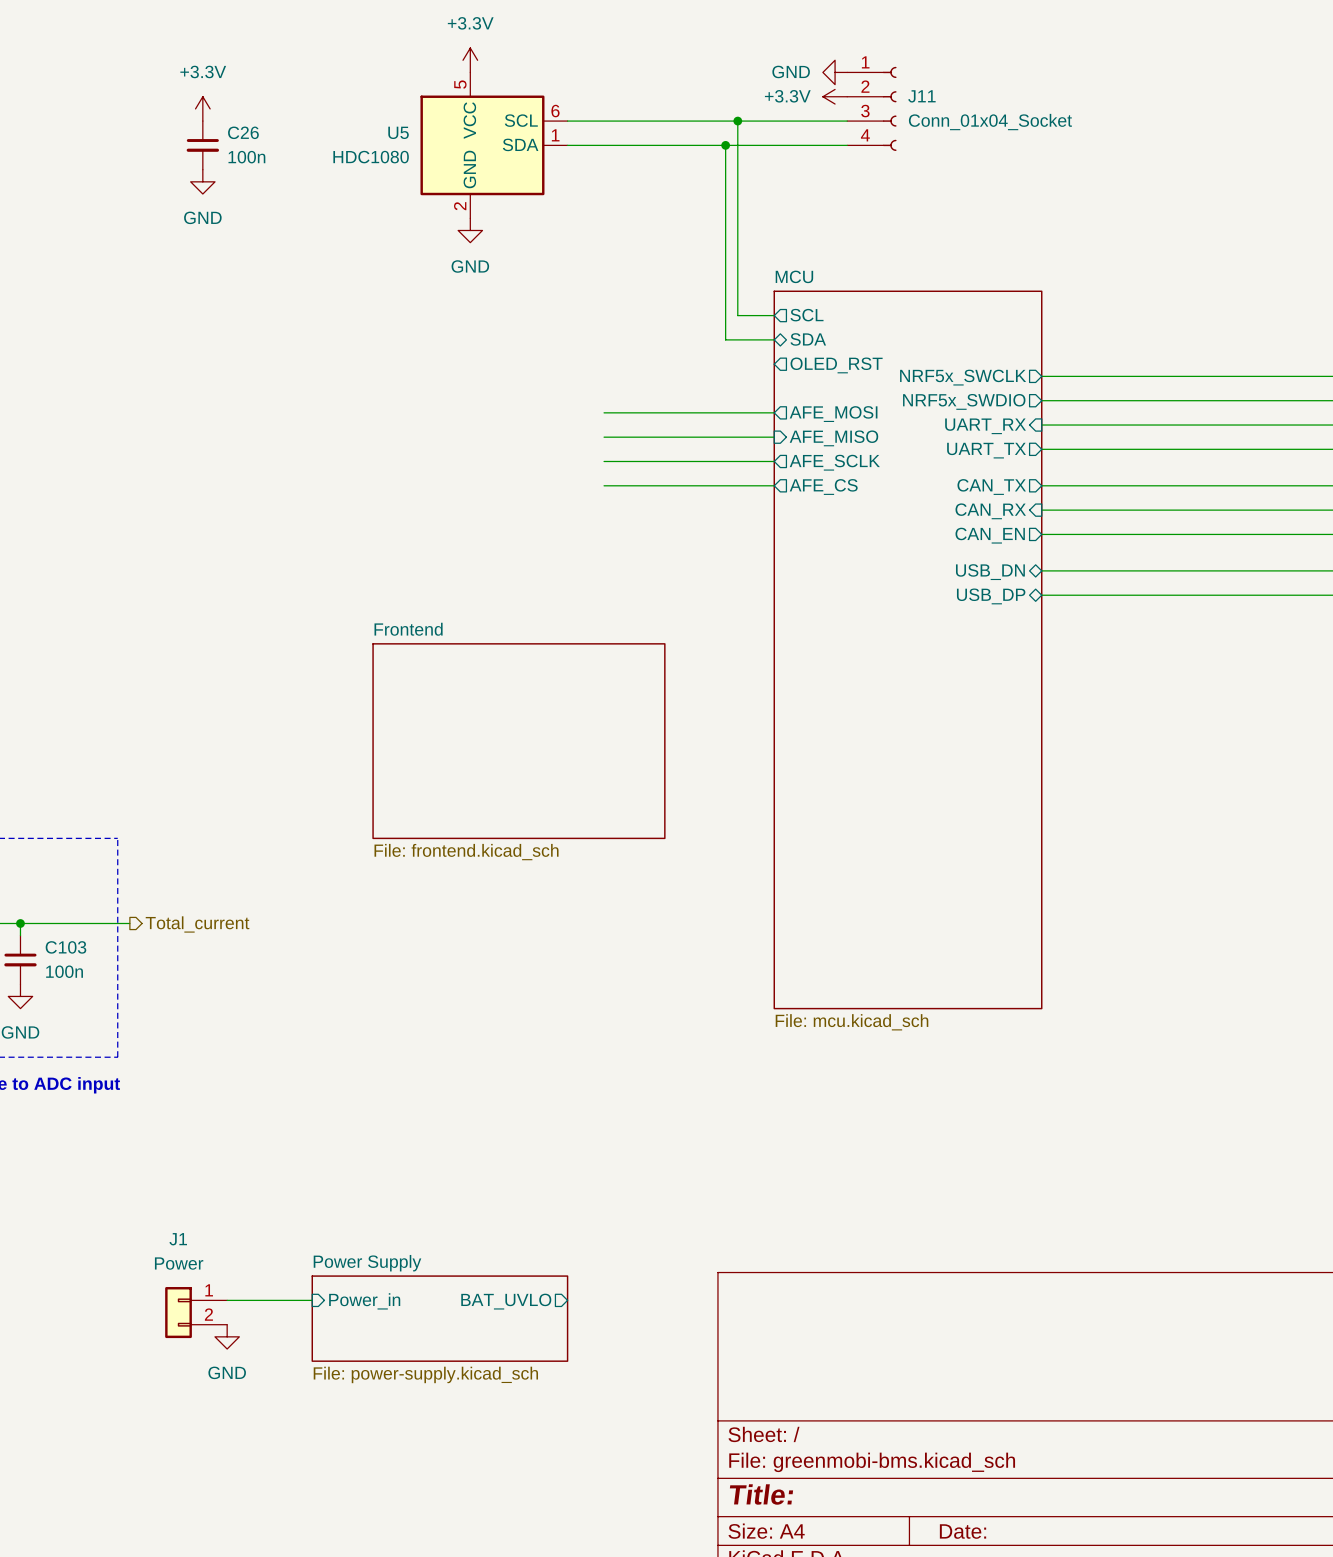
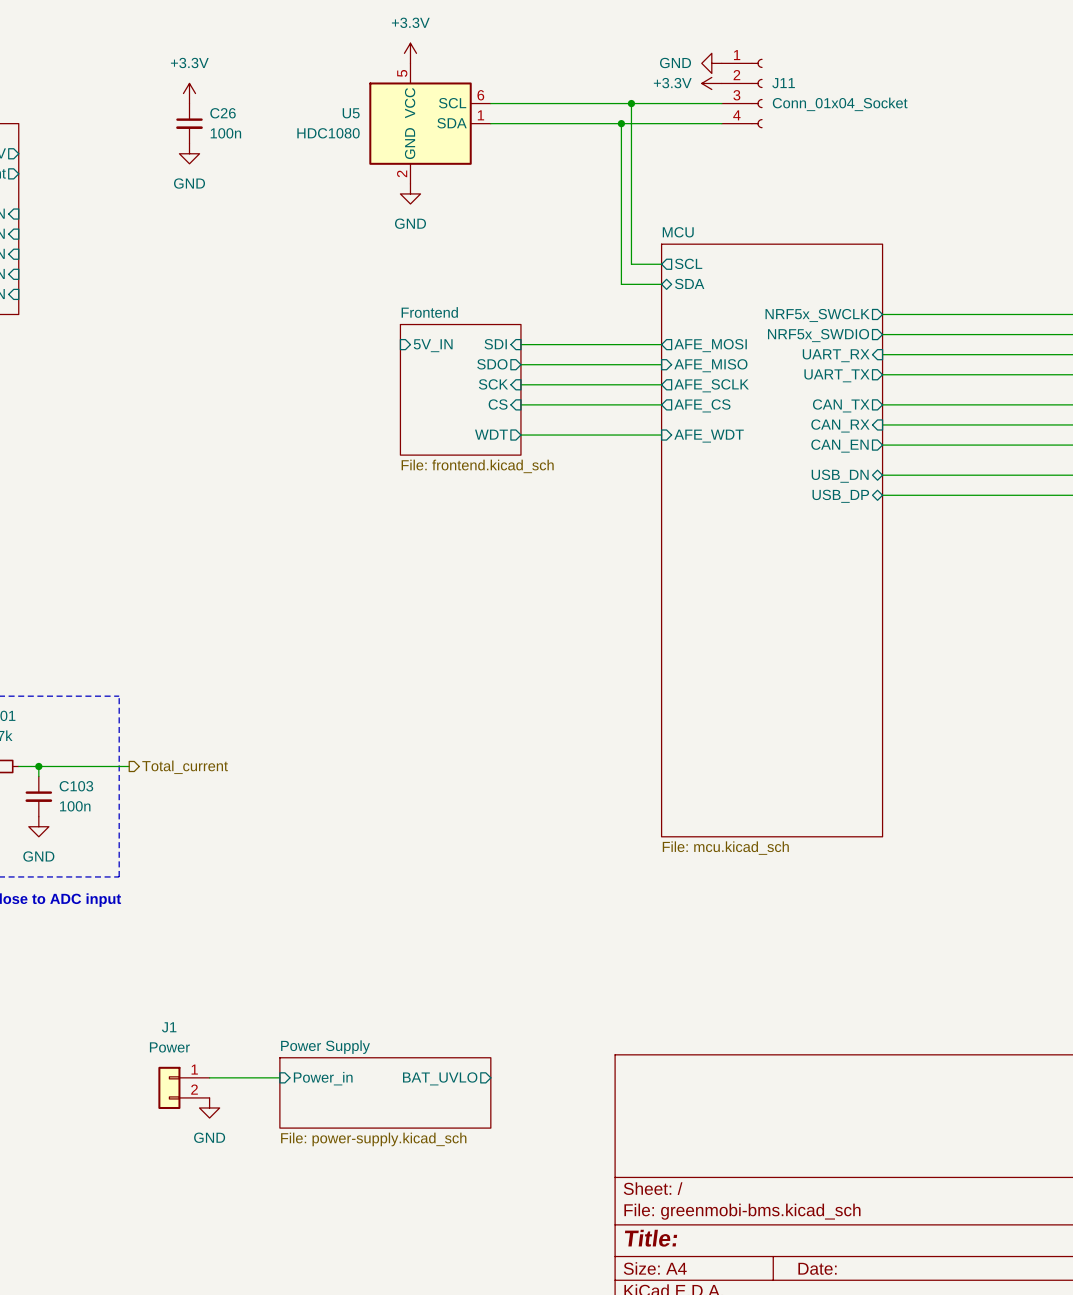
sheet pin: OLED_RST (836, 365) -> none
sheet pin: none -> SDI (495, 344)
sheet pin: none -> 5V_IN (433, 345)
sheet pin: none -> SDO (492, 364)
sheet pin: none -> SCK (493, 384)
sheet Frontend: none -> File: frontend.kicad_sch (460, 389)
sheet pin: none -> CS (498, 404)
sheet pin: none -> WDT (491, 434)
wire: none -> (520, 435) (661, 435)
sheet pin: none -> AFE_WDT (709, 436)
sheet Frontend: File: frontend.kicad_sch (518, 741) -> none

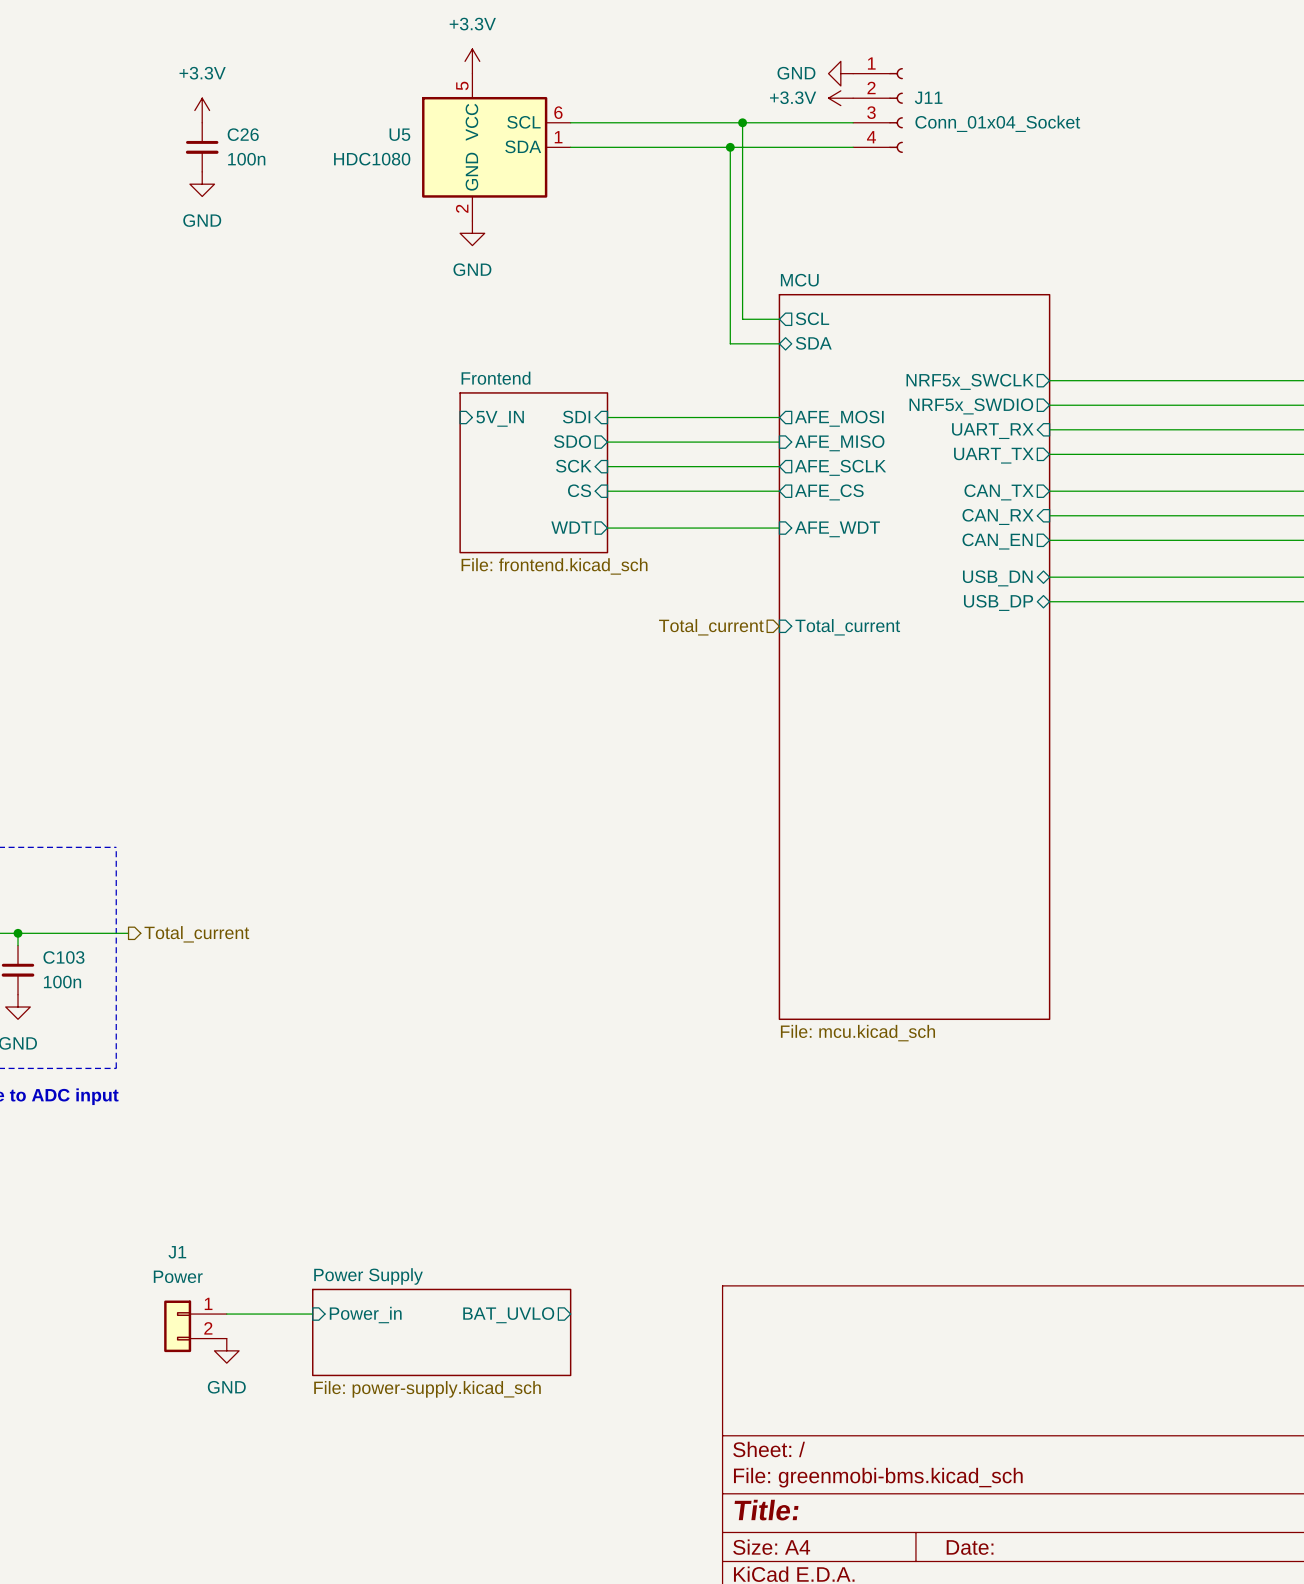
hierarchical label: none -> Total_current (711, 627)
sheet pin: none -> Total_current (847, 627)

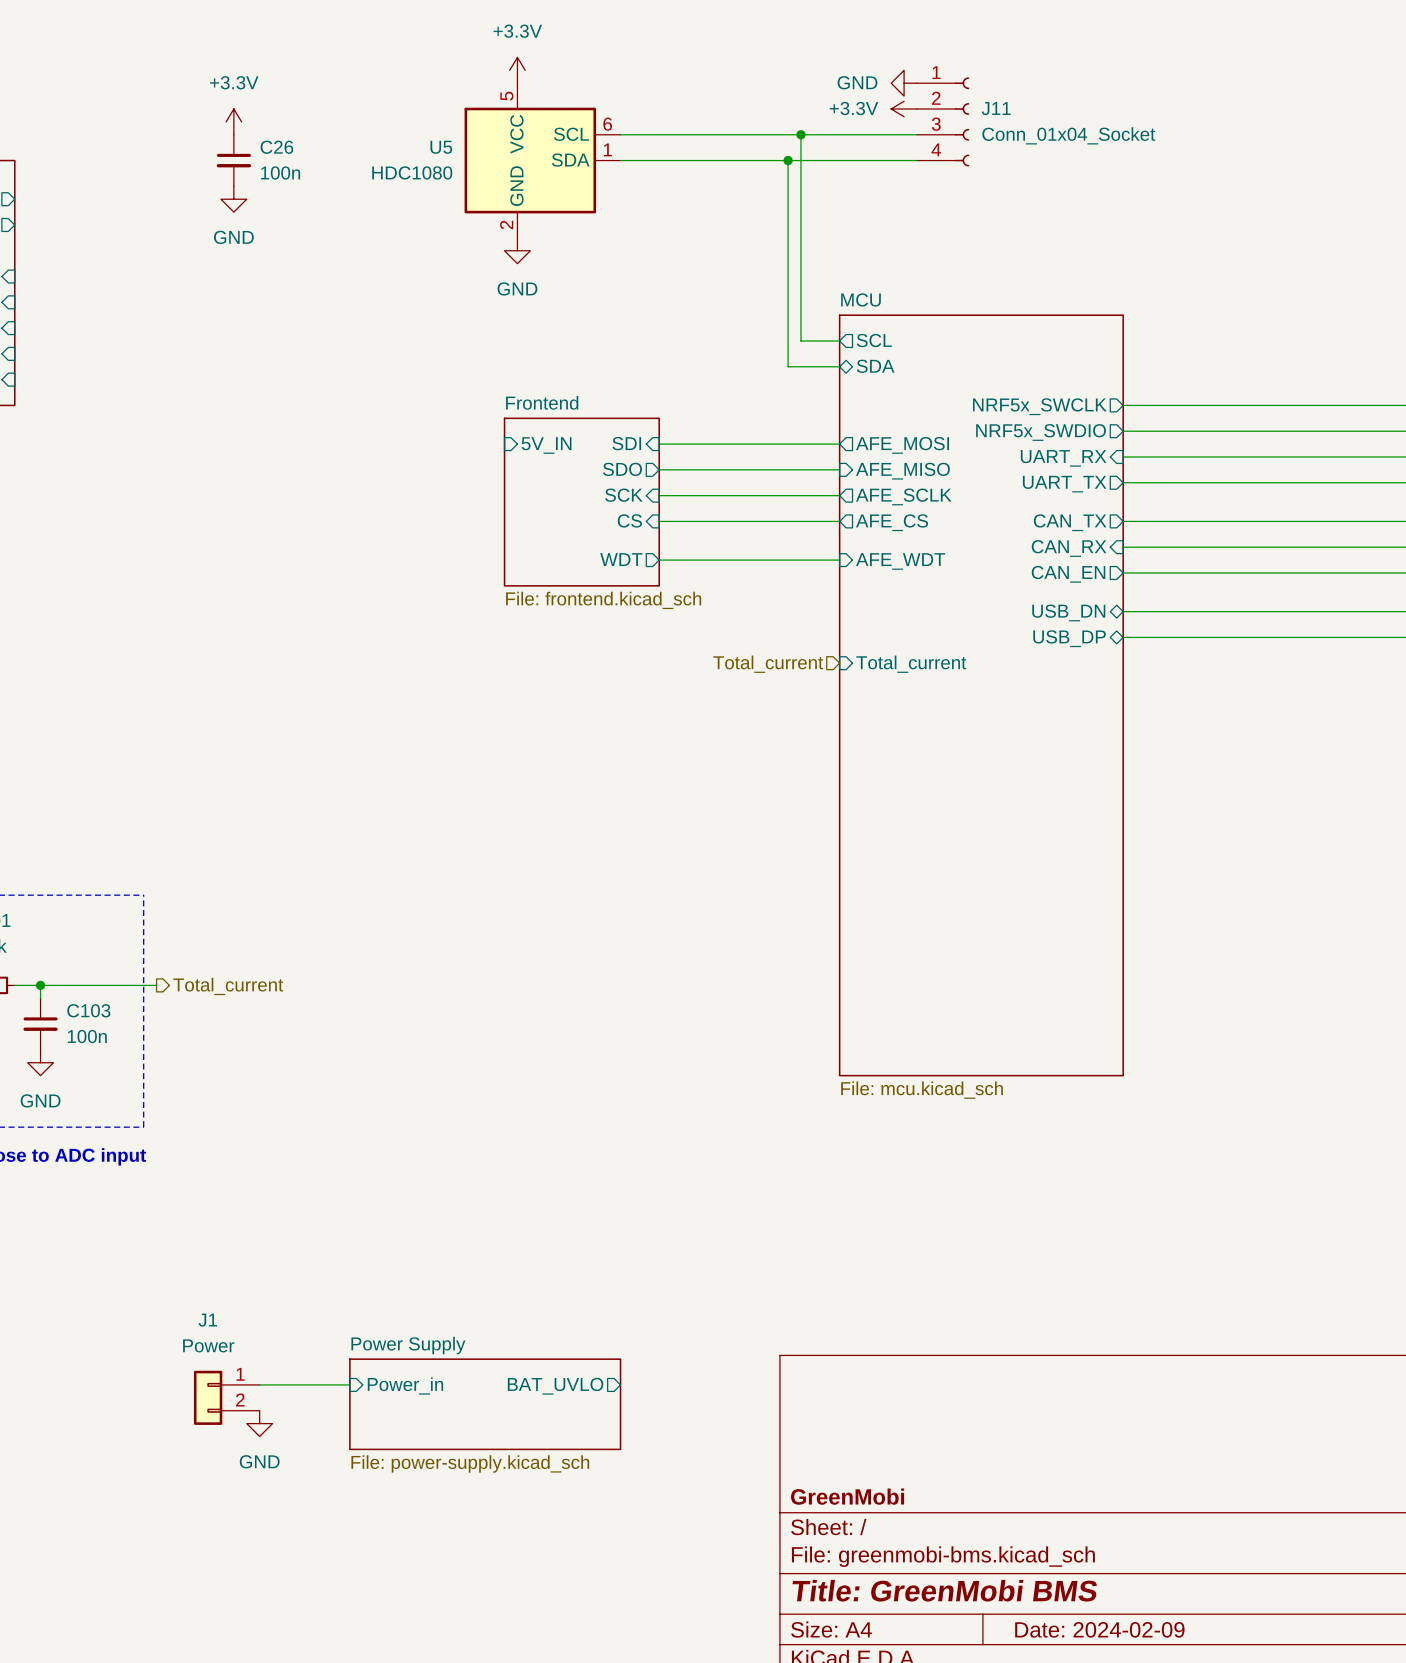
title block: none -> GreenMobi (847, 1496)
title block: Title: (766, 1510) -> Title: GreenMobi BMS (944, 1590)
title block: Date: (970, 1547) -> Date: 2024-02-09 (1099, 1629)

